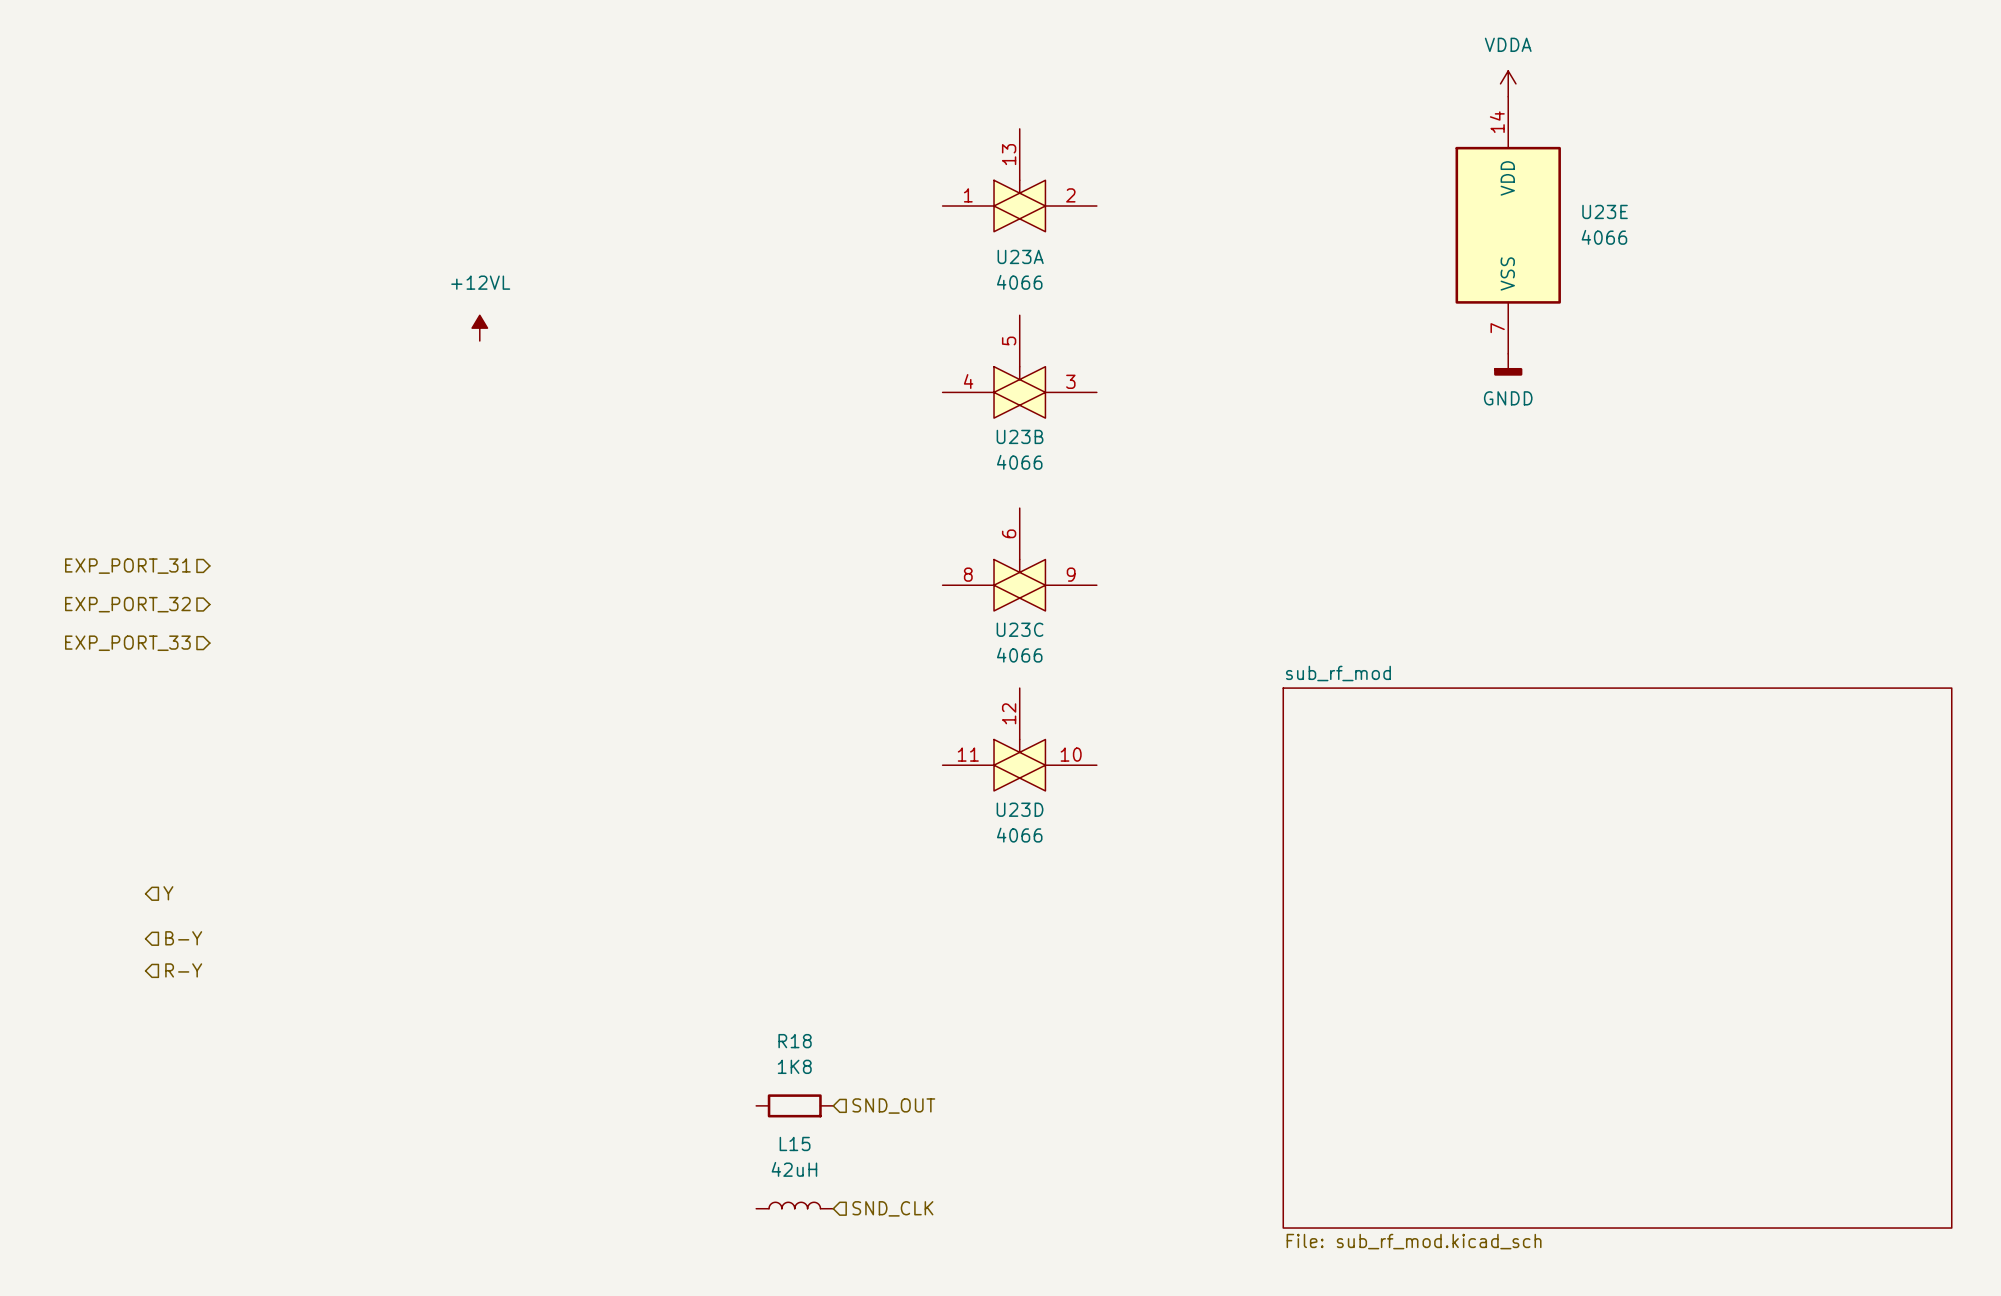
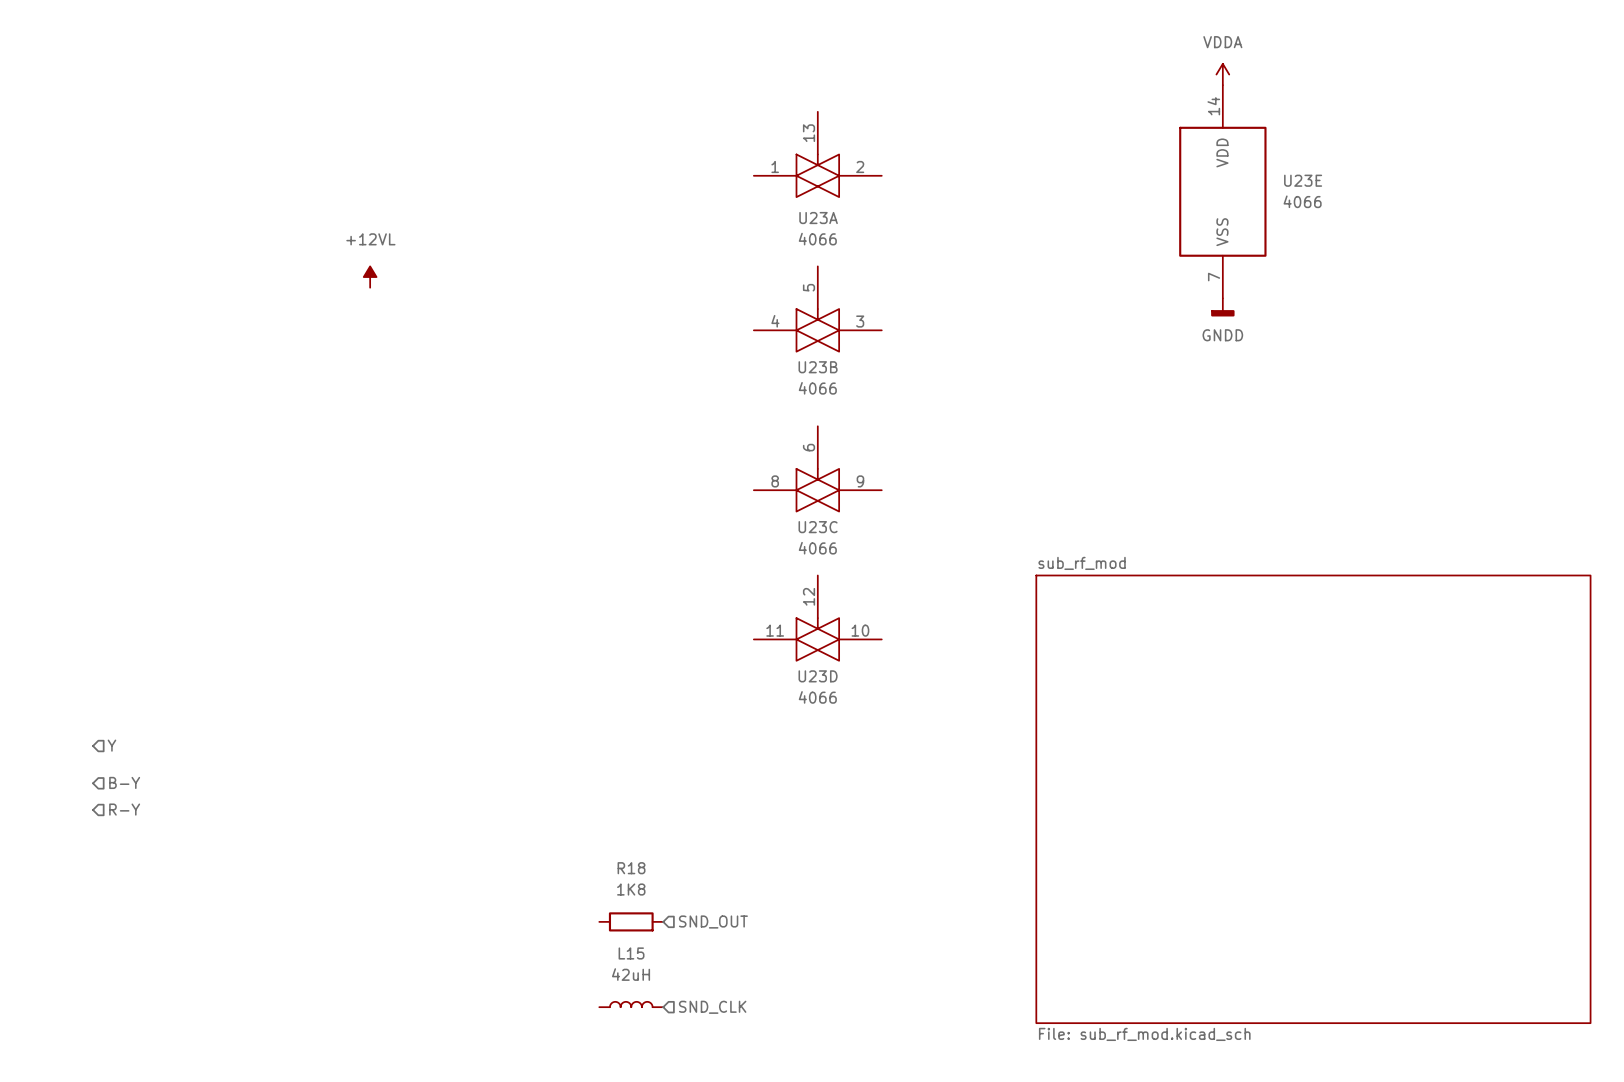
hierarchical label: EXP_PORT_31 (127, 566) -> none
hierarchical label: EXP_PORT_32 (127, 604) -> none
hierarchical label: EXP_PORT_33 (127, 643) -> none

